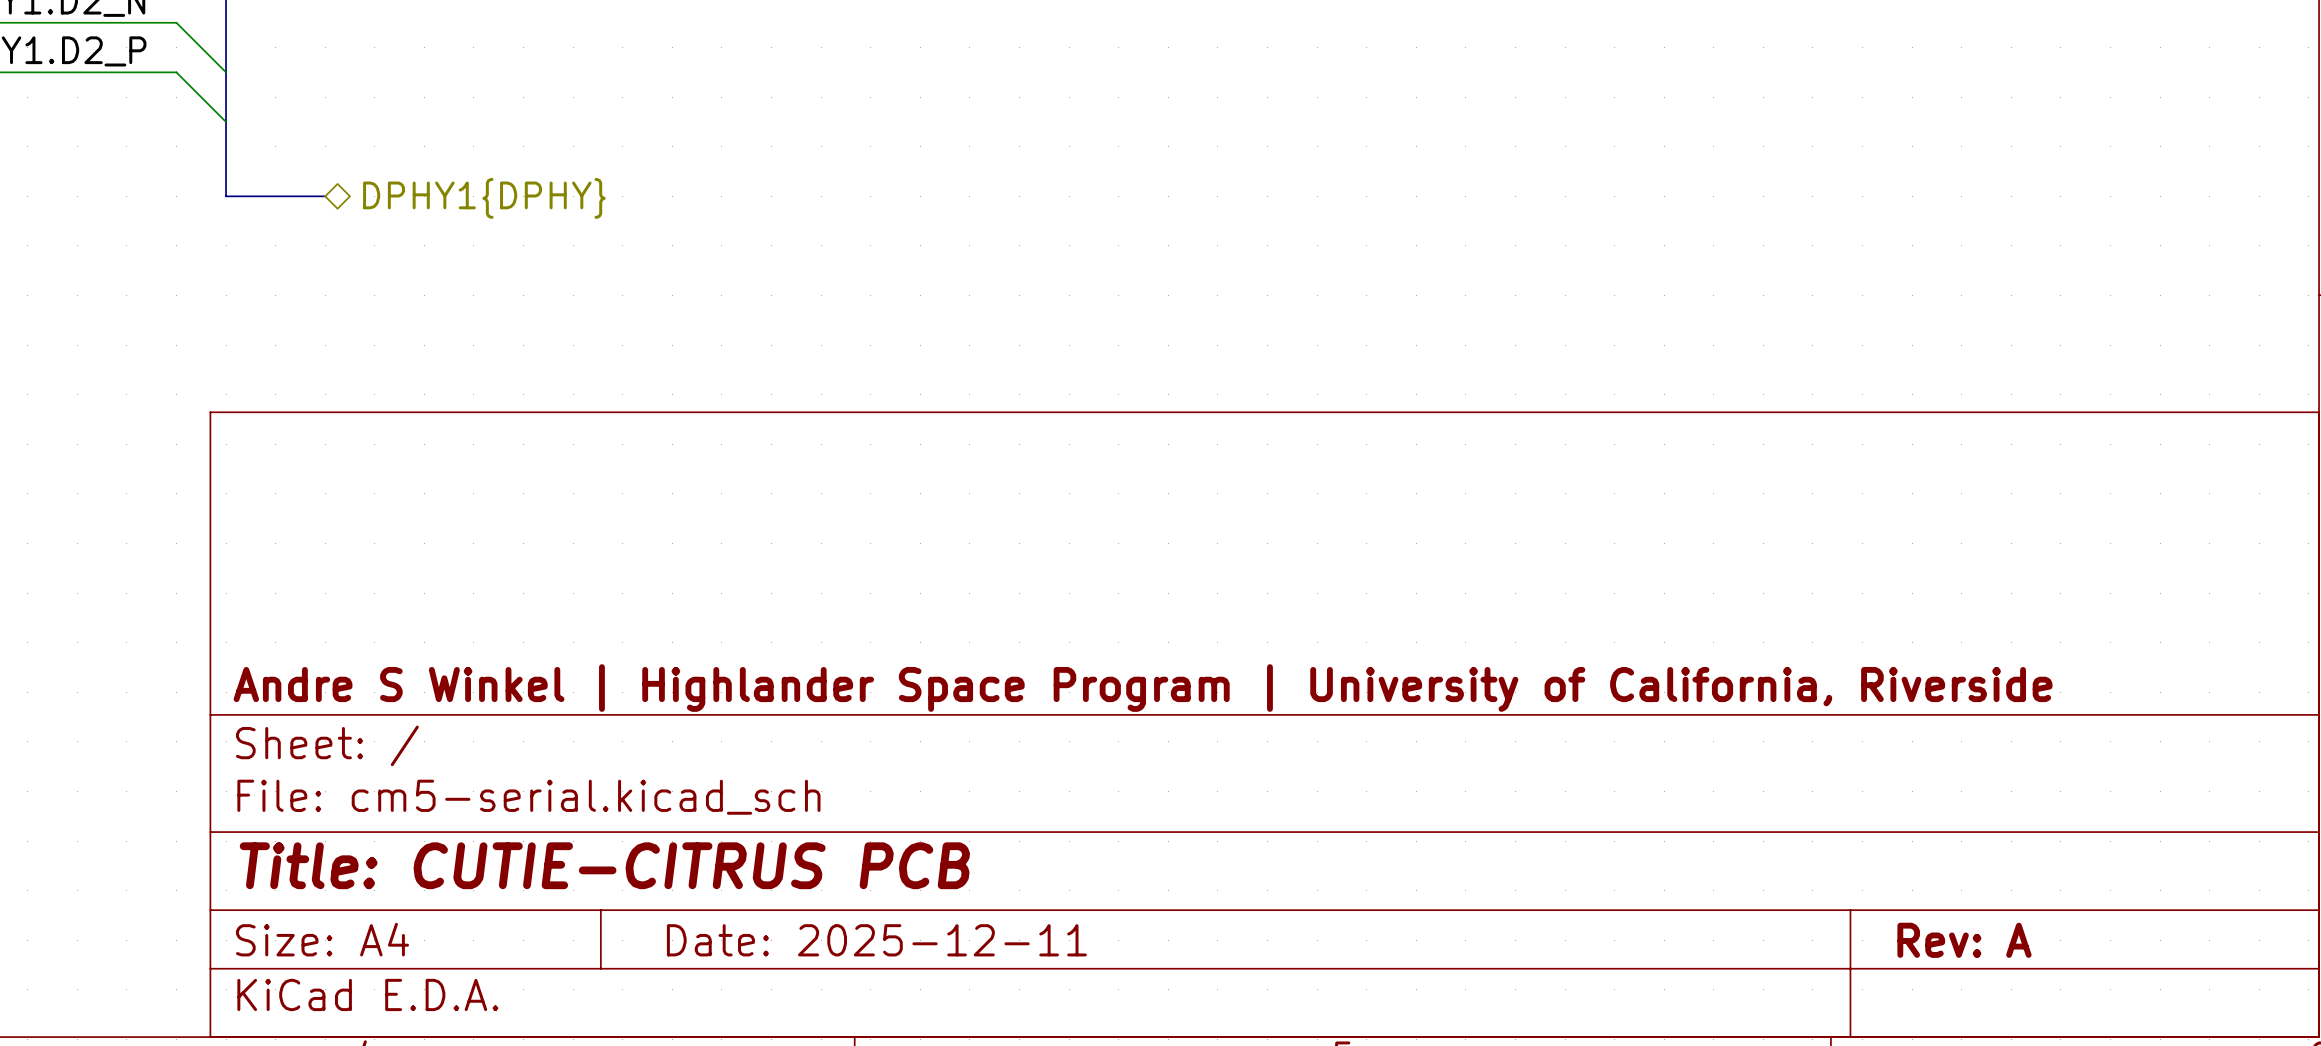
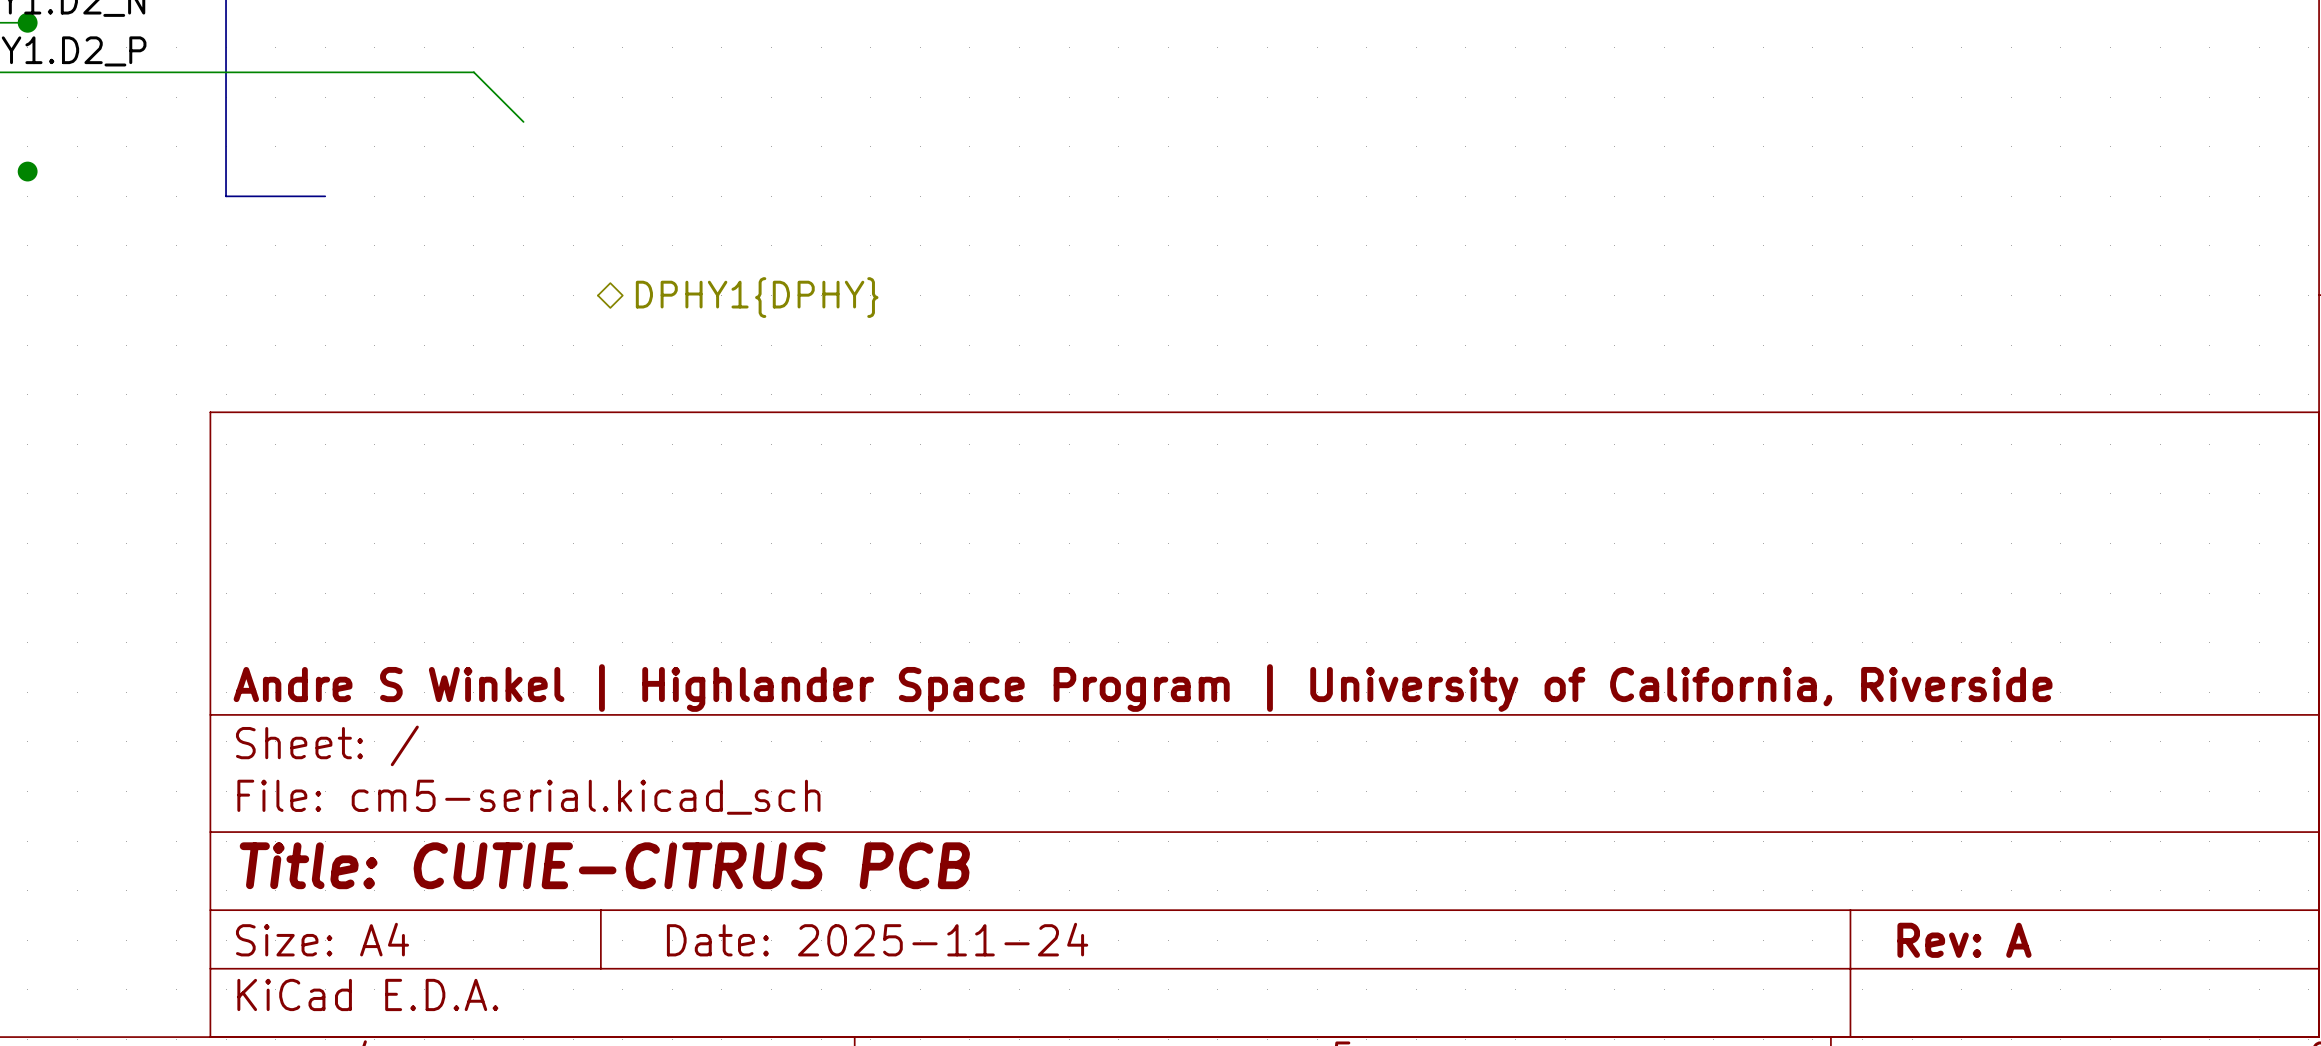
wire: (27, 22) (176, 22) (226, 72) -> none
junction: none -> (27, 22)
wire: (176, 72) (226, 121) -> (176, 72) (473, 72) (523, 121)
junction: none -> (27, 171)
hierarchical label position: DPHY1{DPHY} (484, 198) -> DPHY1{DPHY} (757, 297)
title block: Date: 2025-12-11 (876, 940) -> Date: 2025-11-24 (877, 939)

